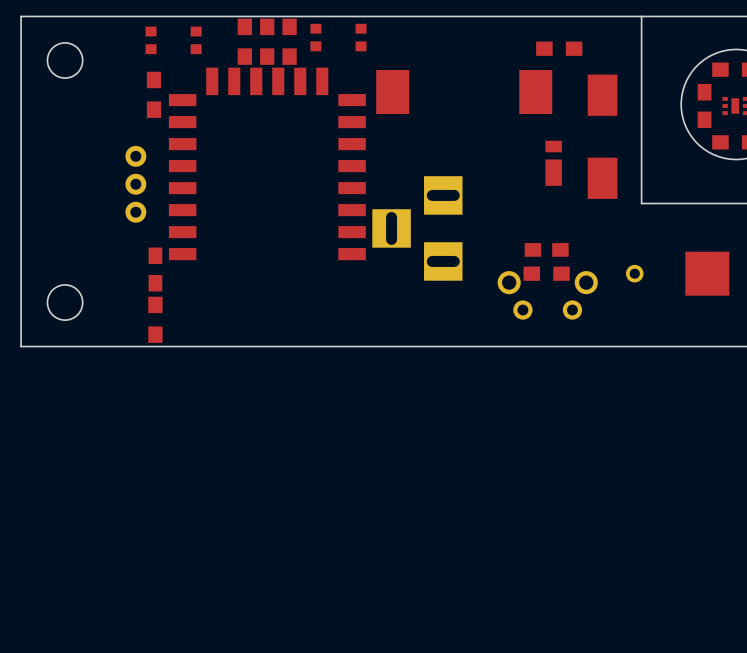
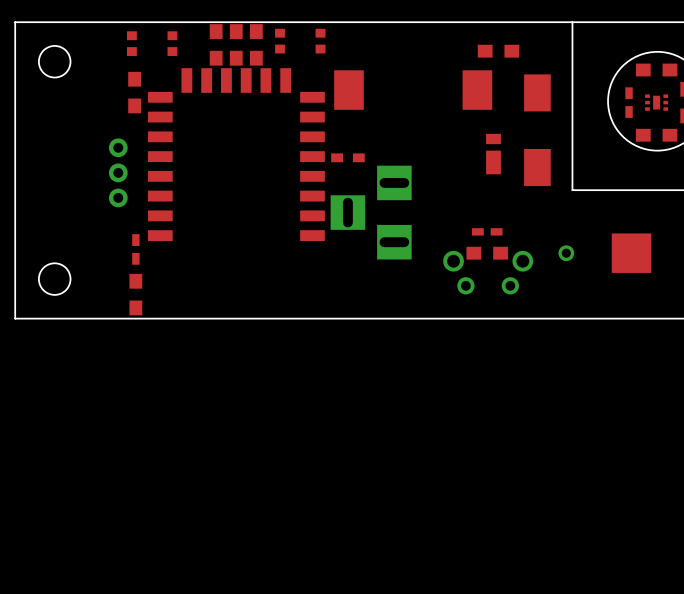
part footprint: [697, 84, 712, 129] -> [625, 87, 633, 118]
part: none -> (347, 157)
part footprint: [524, 243, 569, 257] -> [471, 228, 503, 236]
part footprint: [148, 247, 163, 292] -> [132, 234, 140, 265]

